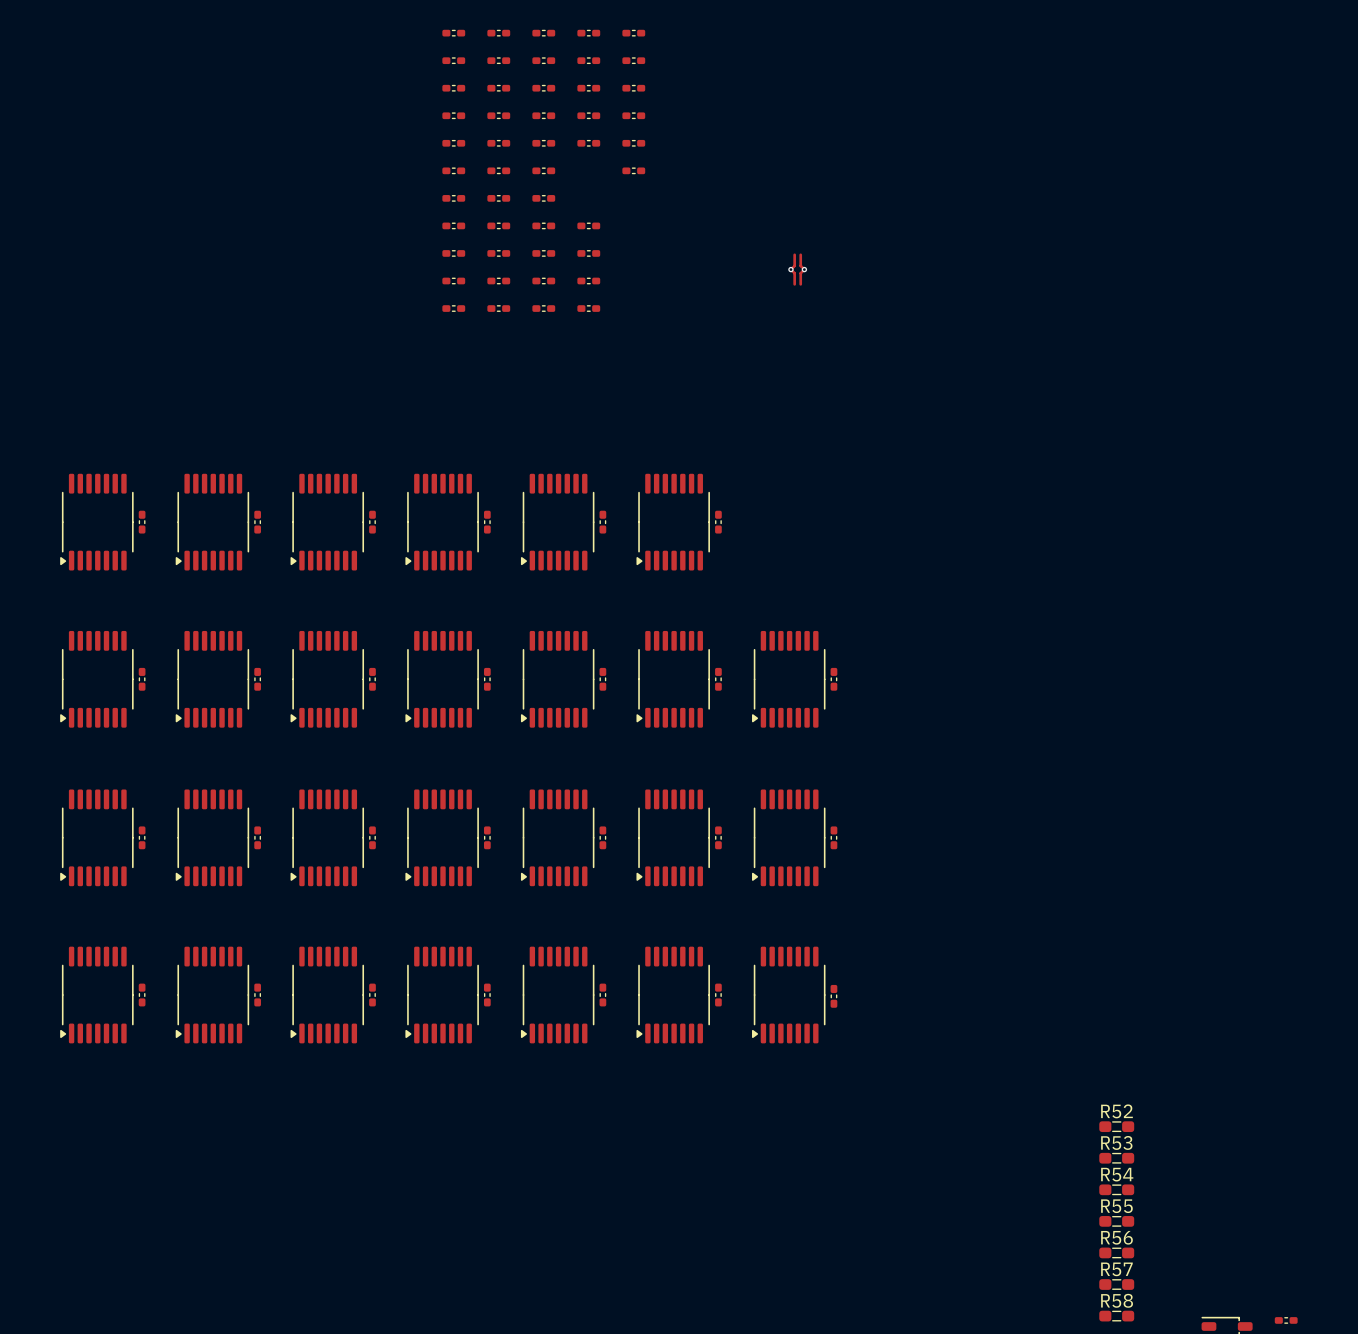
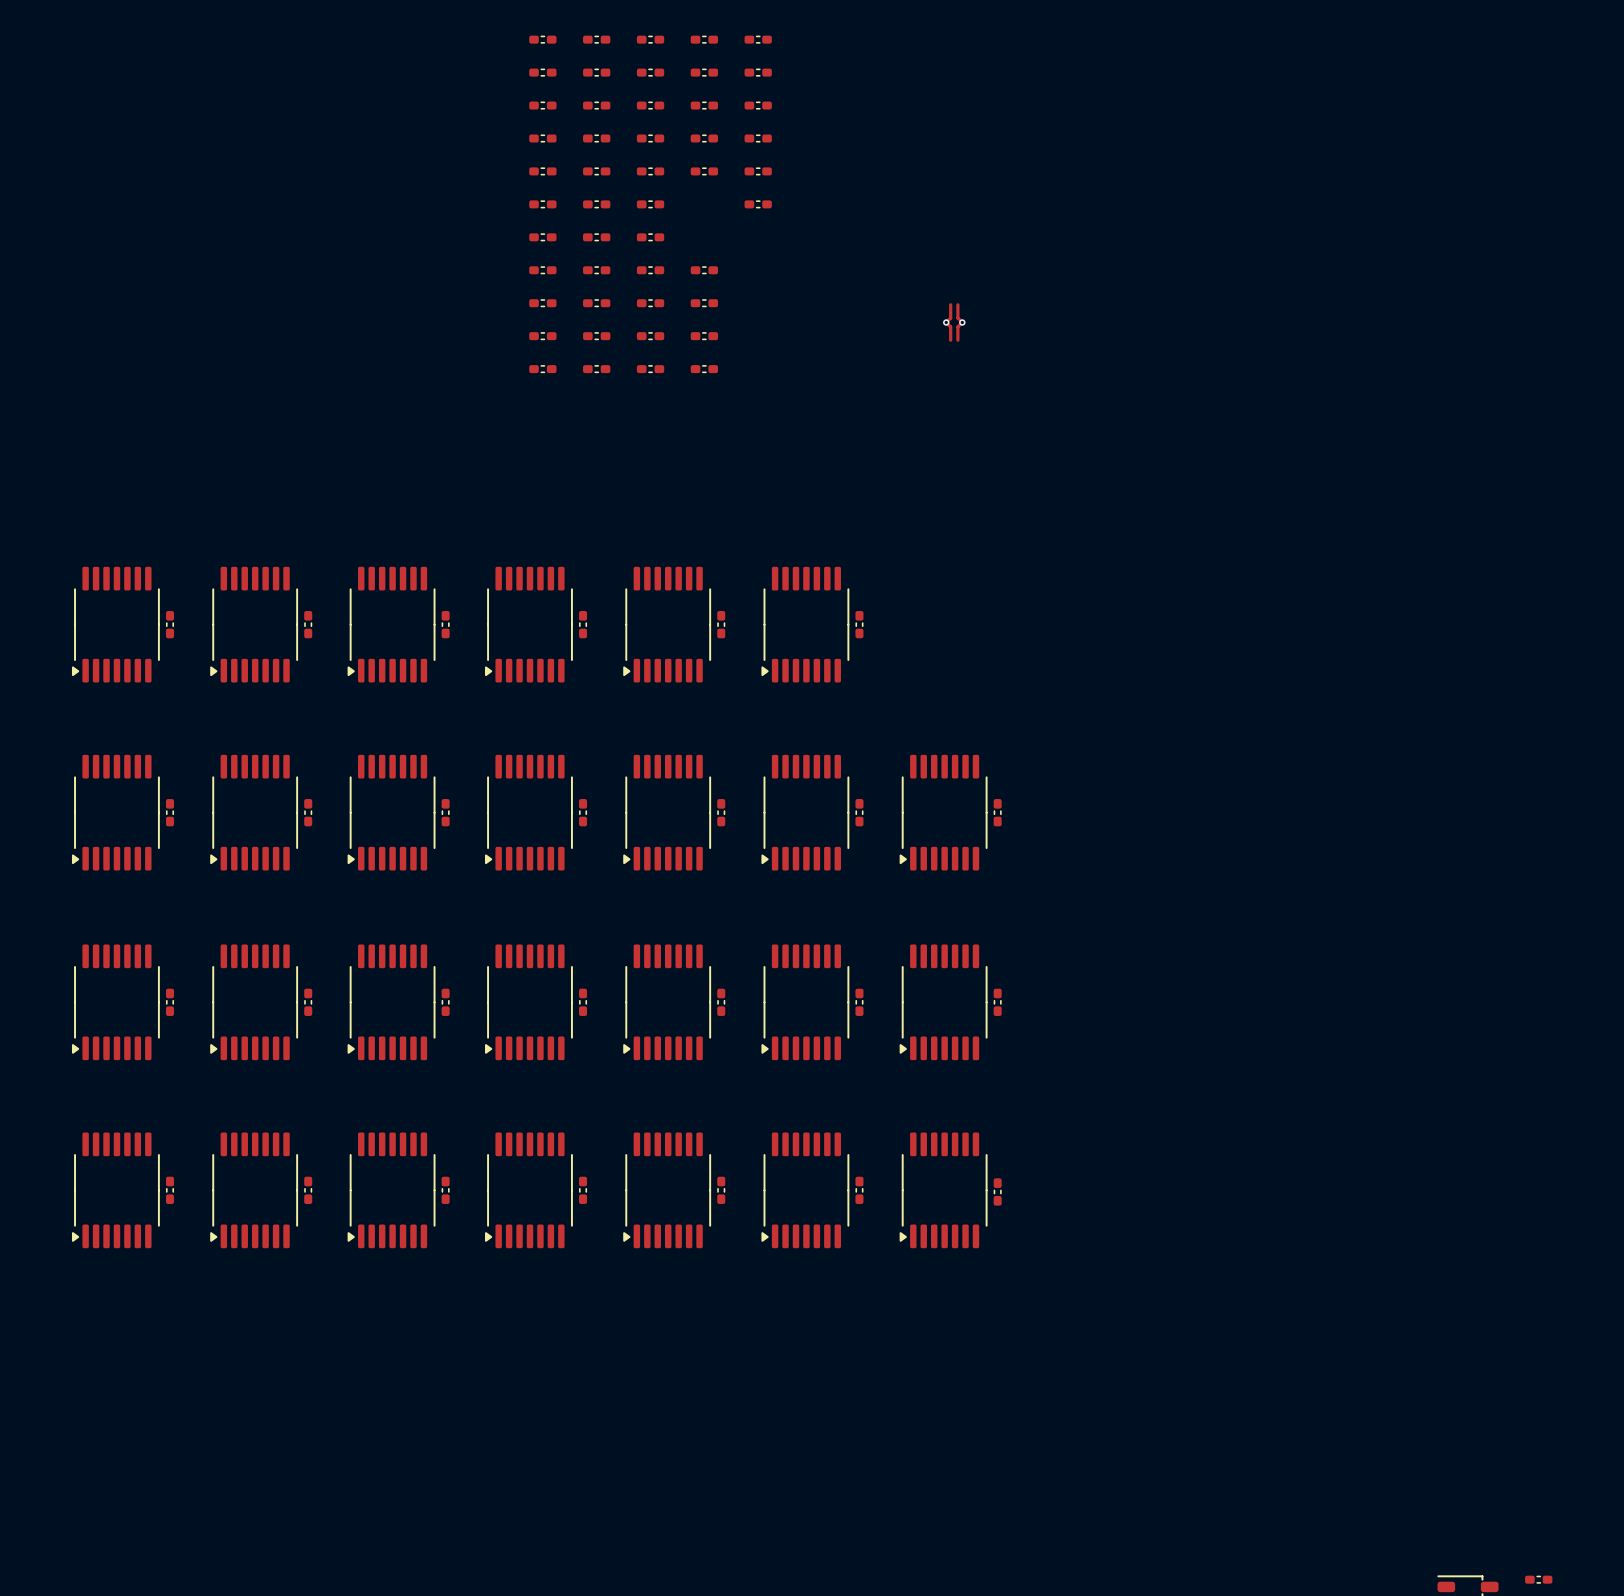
R52: (1116, 1126) -> none
R53: (1116, 1158) -> none
R54: (1116, 1189) -> none
R55: (1116, 1221) -> none
R56: (1116, 1252) -> none
R57: (1116, 1284) -> none
R58: (1116, 1316) -> none

